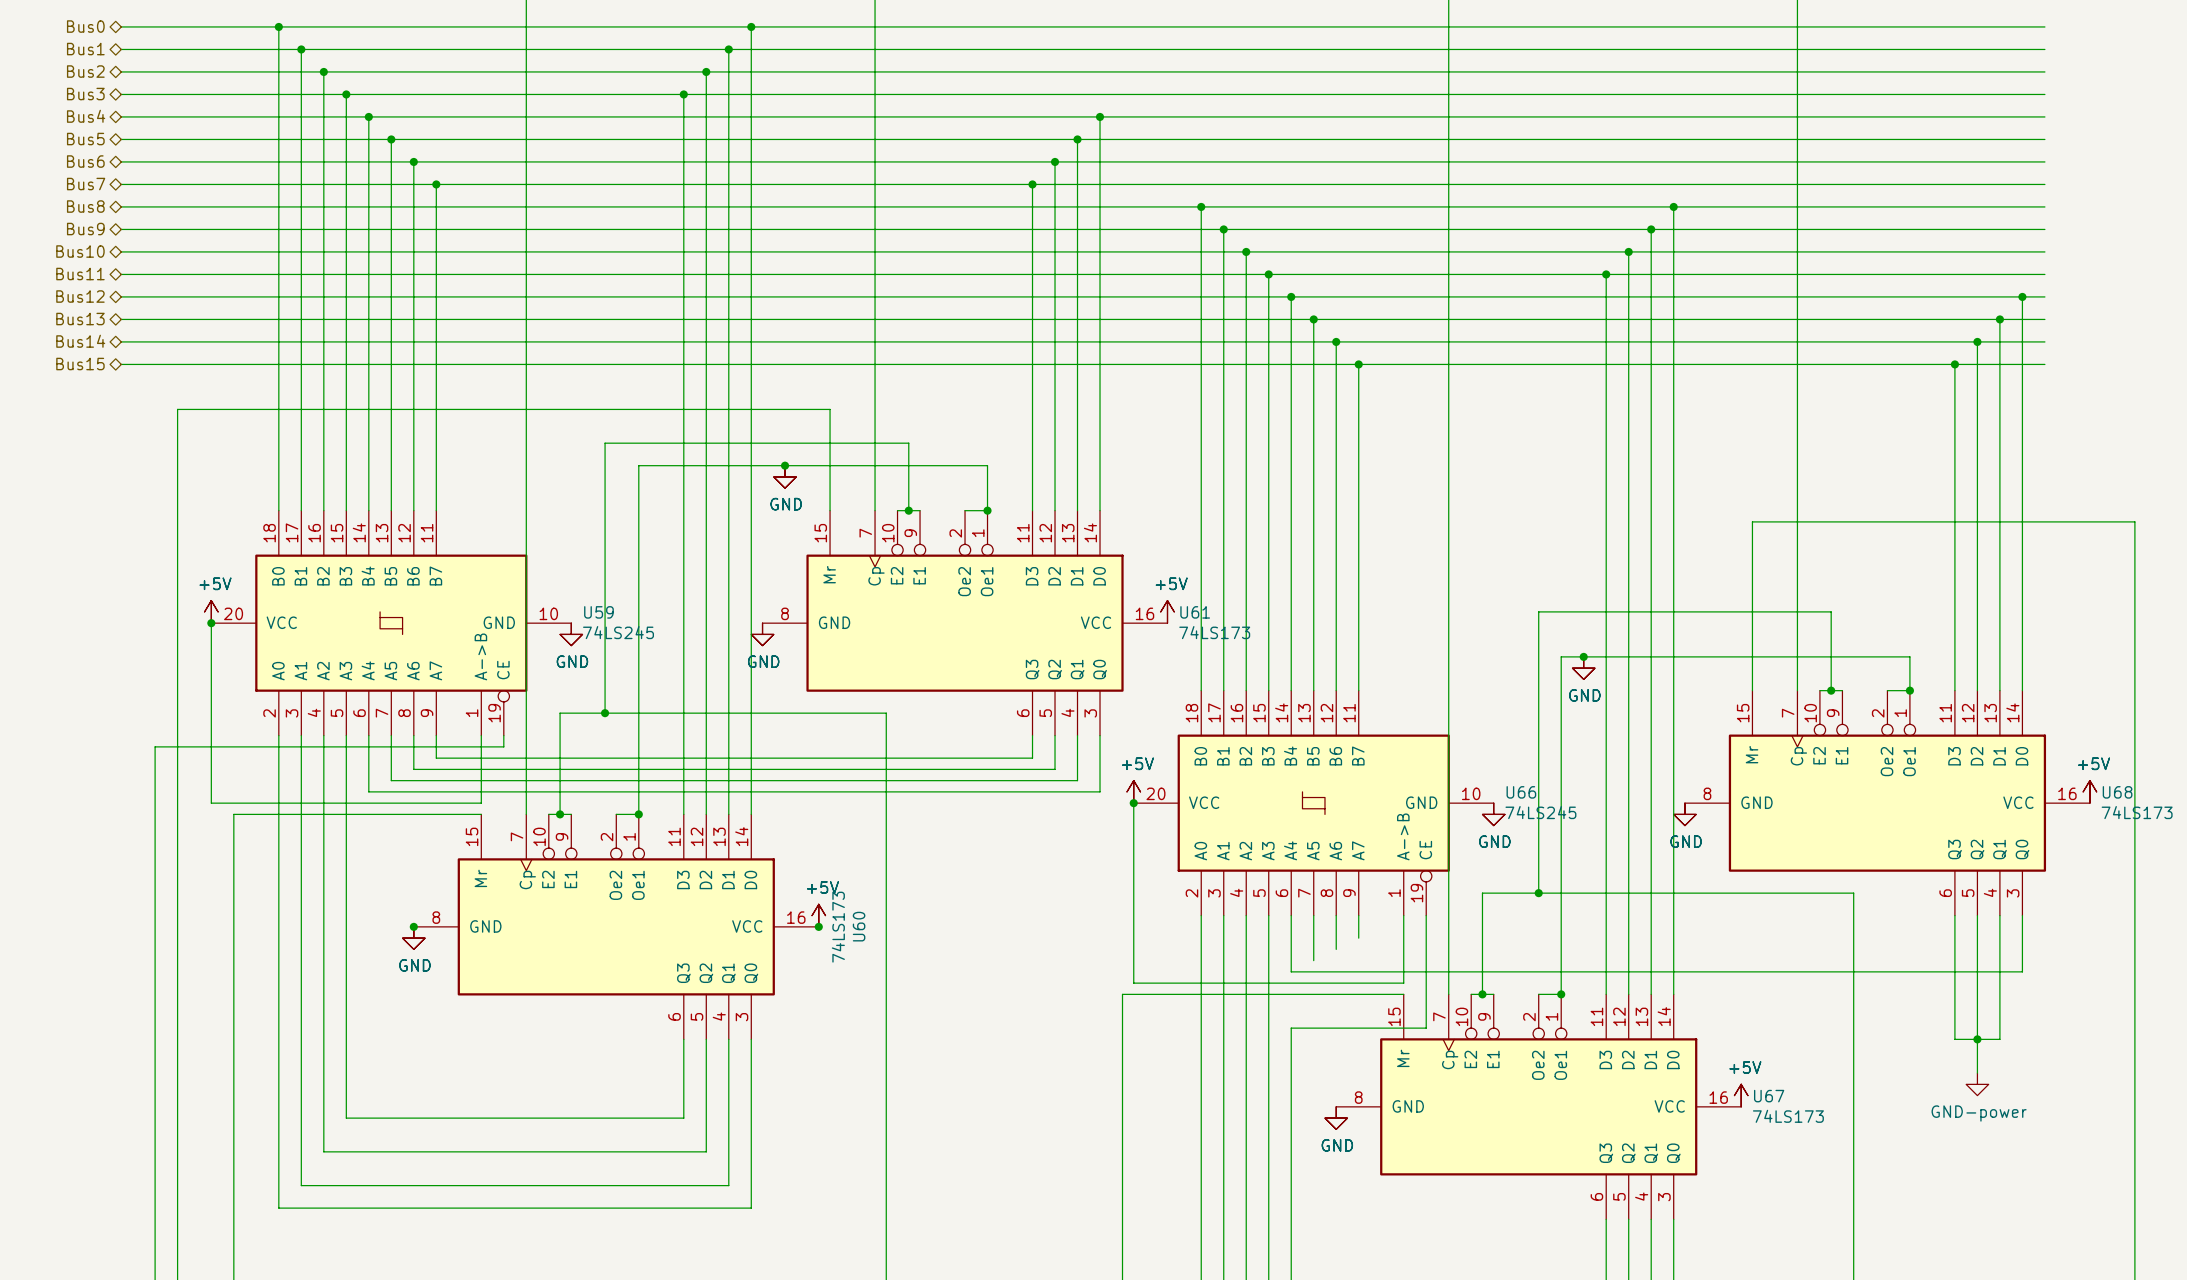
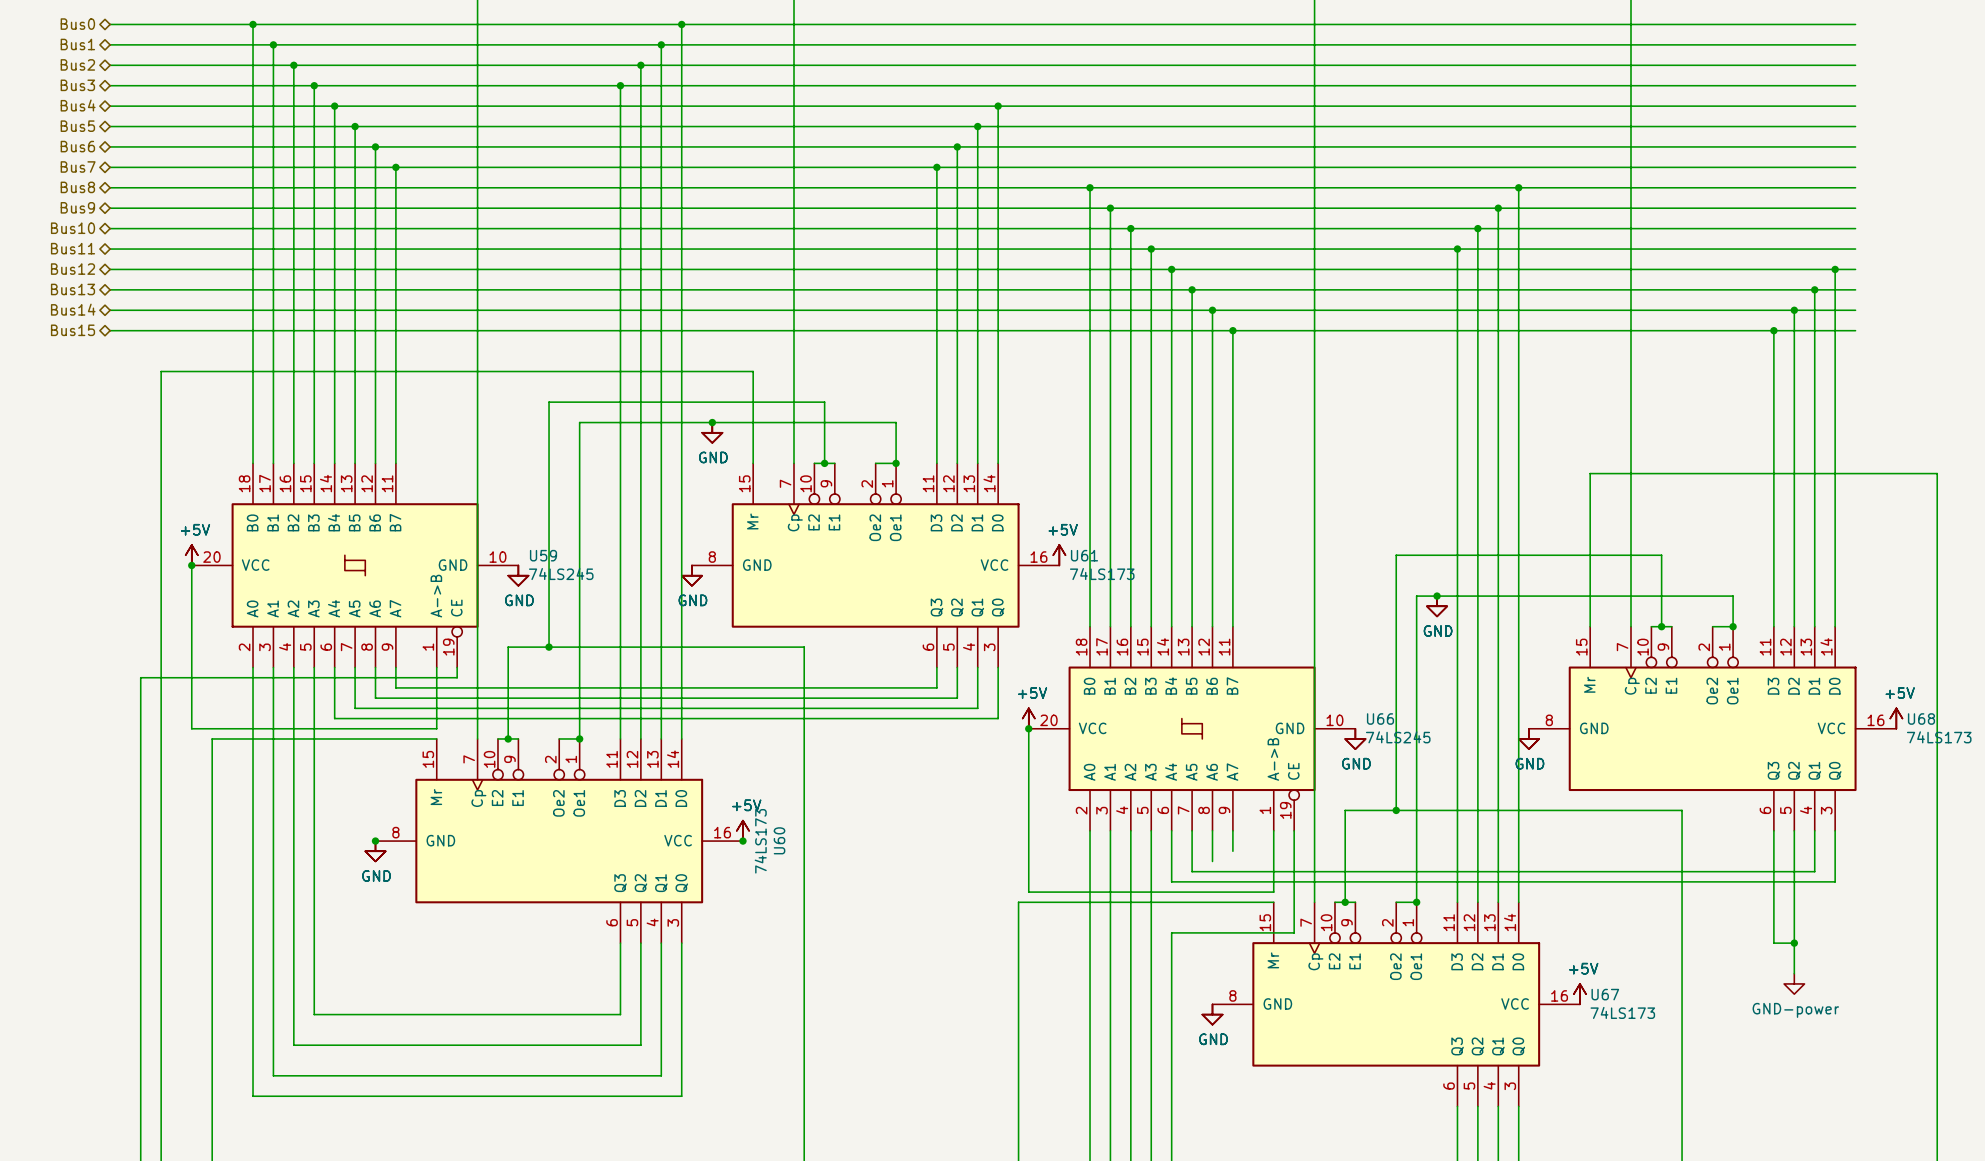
wire: (1999, 960) (1999, 1039) (1977, 1039) -> (1814, 871) (1192, 871)

